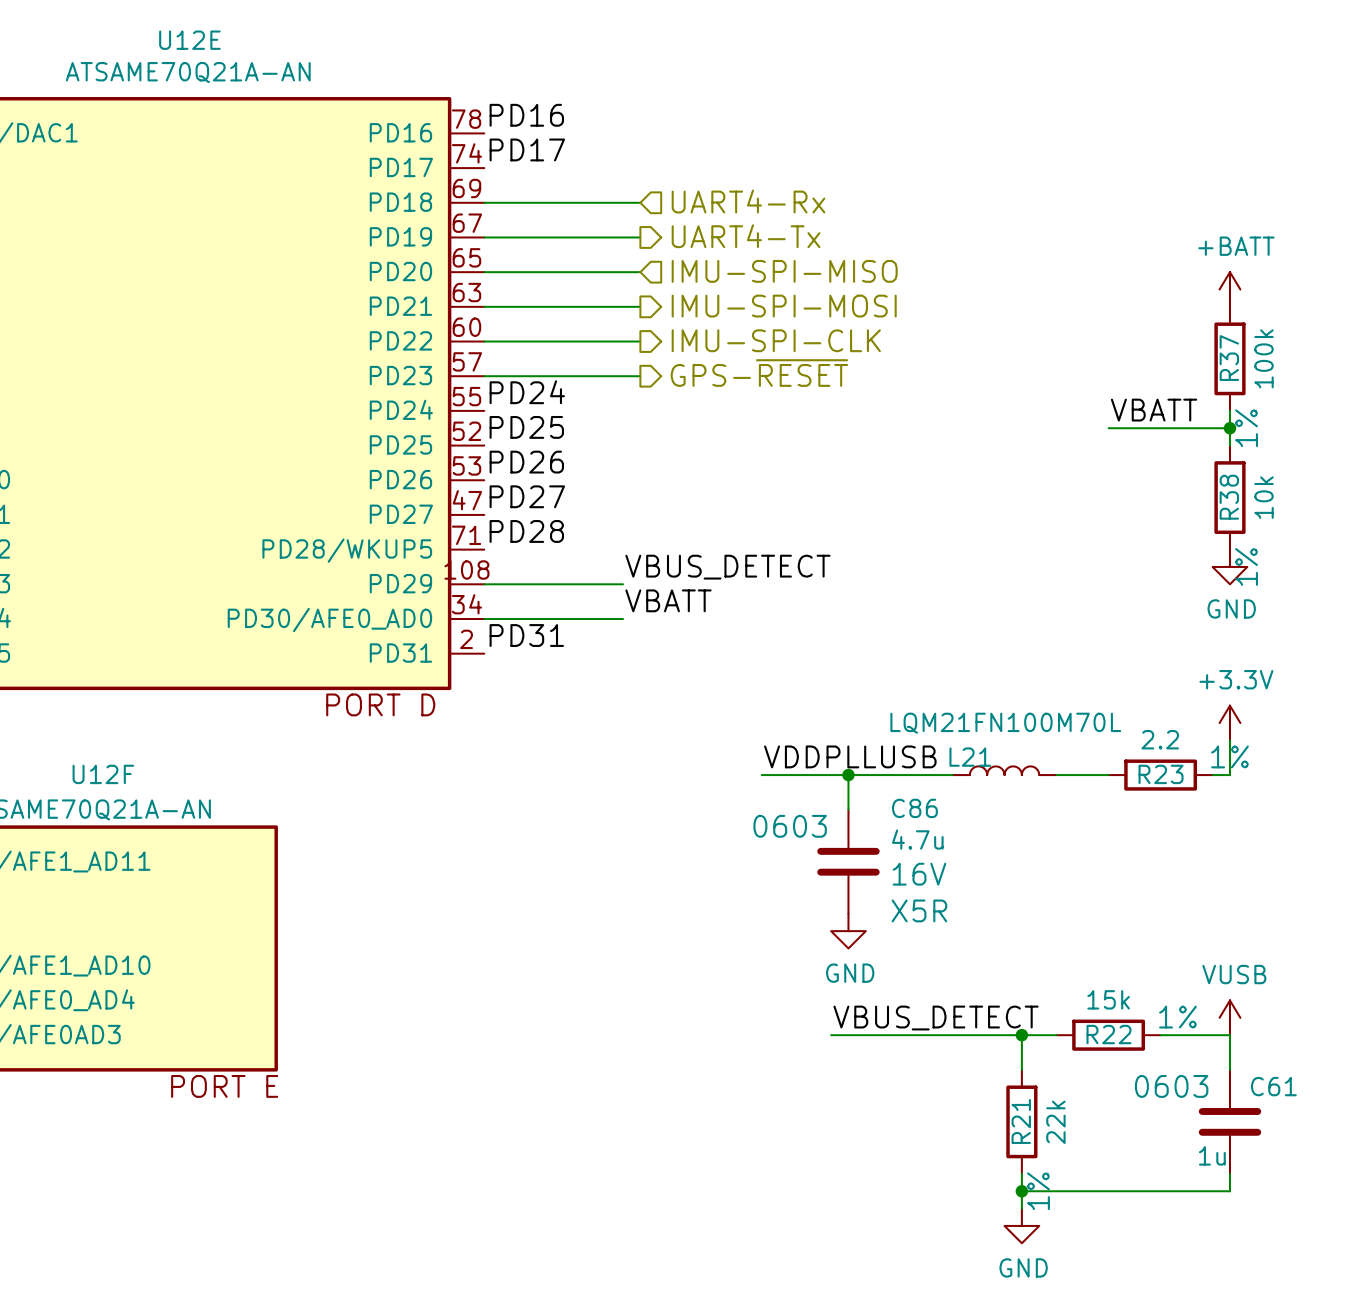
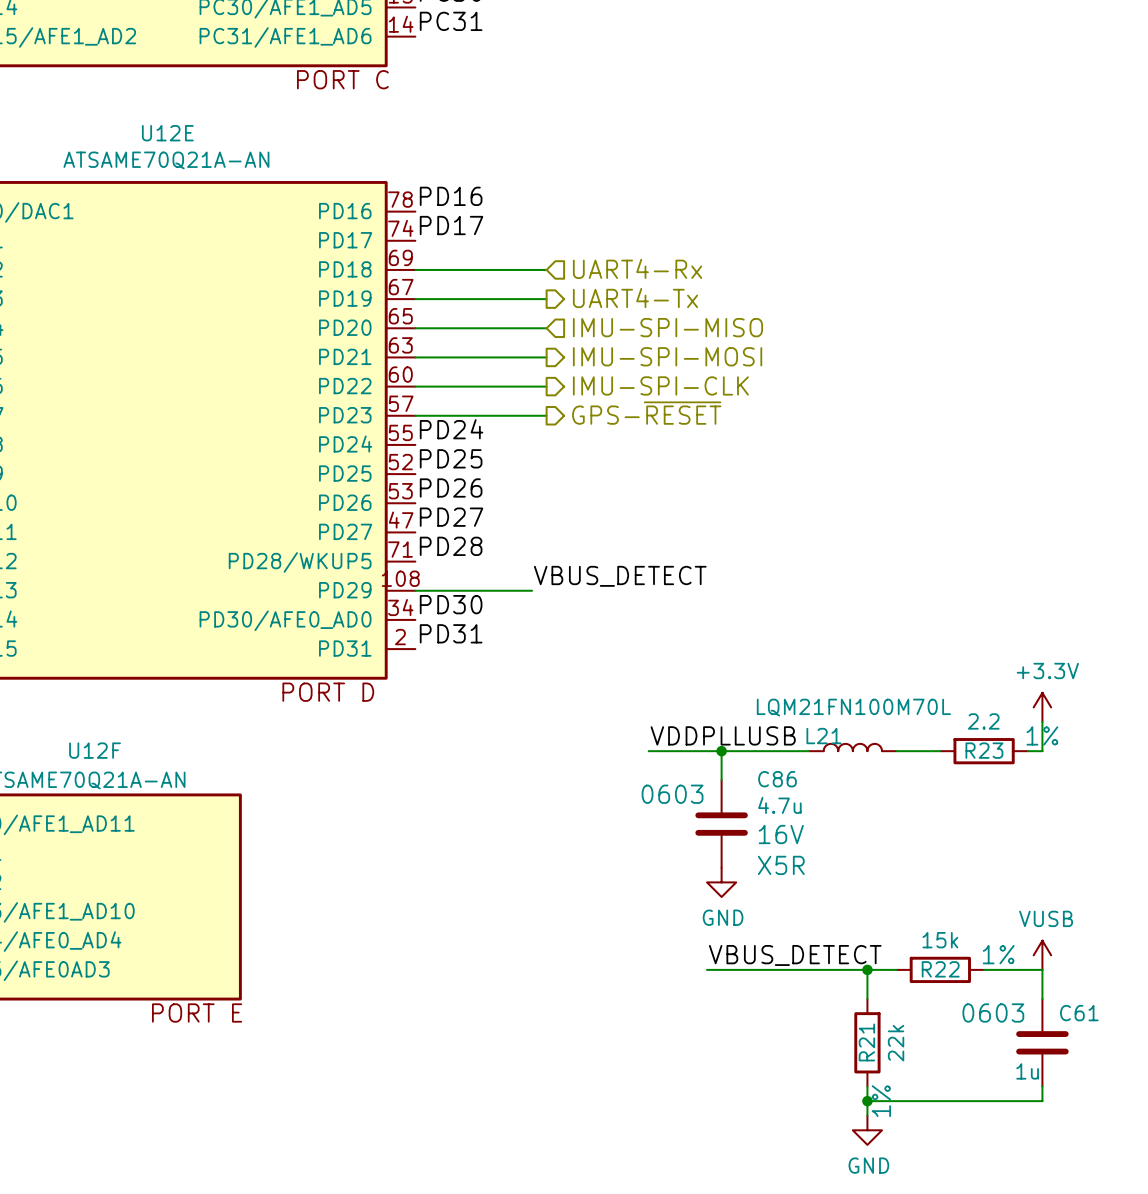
power symbol: +BATT (1229, 289) -> none
R37: 100k (1229, 358) -> none
label: VBATT (1154, 410) -> none
wire: (1229, 410) (1229, 445) -> none
wire: (1108, 428) (1229, 428) -> none
junction: (1229, 428) -> none
R38: 10k (1229, 497) -> none
power symbol: GND (1229, 566) -> none
label: none -> PD30 (451, 604)
label: VBATT (668, 600) -> none
wire: (484, 618) (623, 618) -> none

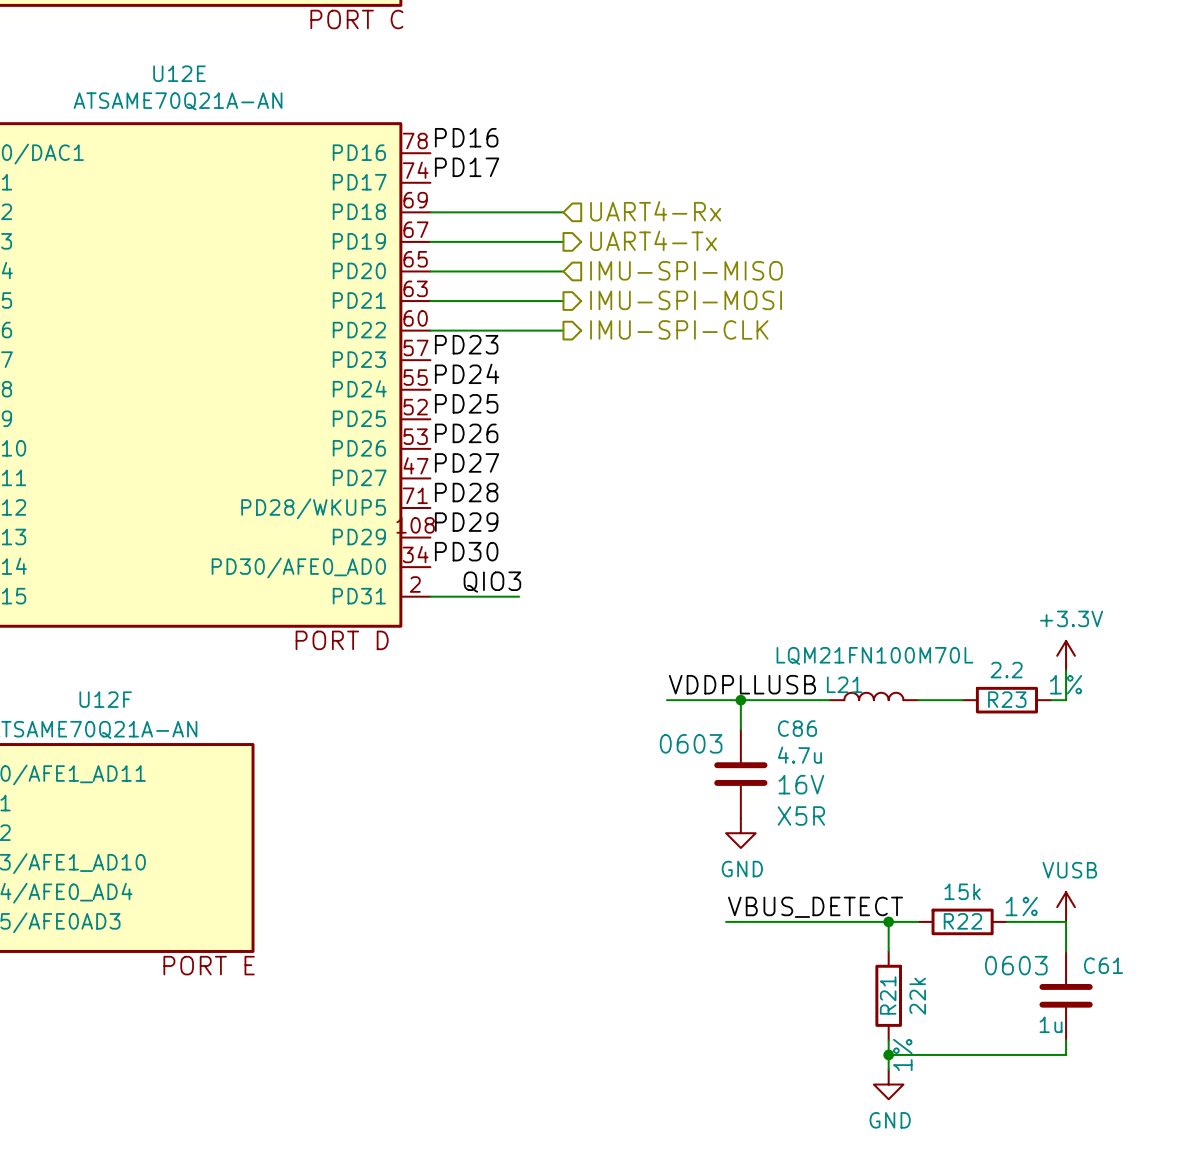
label: none -> PD23 (466, 344)
hierarchical label: GPS-~{RESET} (646, 413) -> none
wire: (415, 415) (546, 415) -> none
label: none -> PD29 (466, 522)
label: VBUS_DETECT (620, 576) -> none
wire: (415, 590) (532, 590) -> none
label: PD31 (451, 633) -> none
label: none -> QIO3 (492, 582)
wire: none -> (430, 596) (519, 596)

